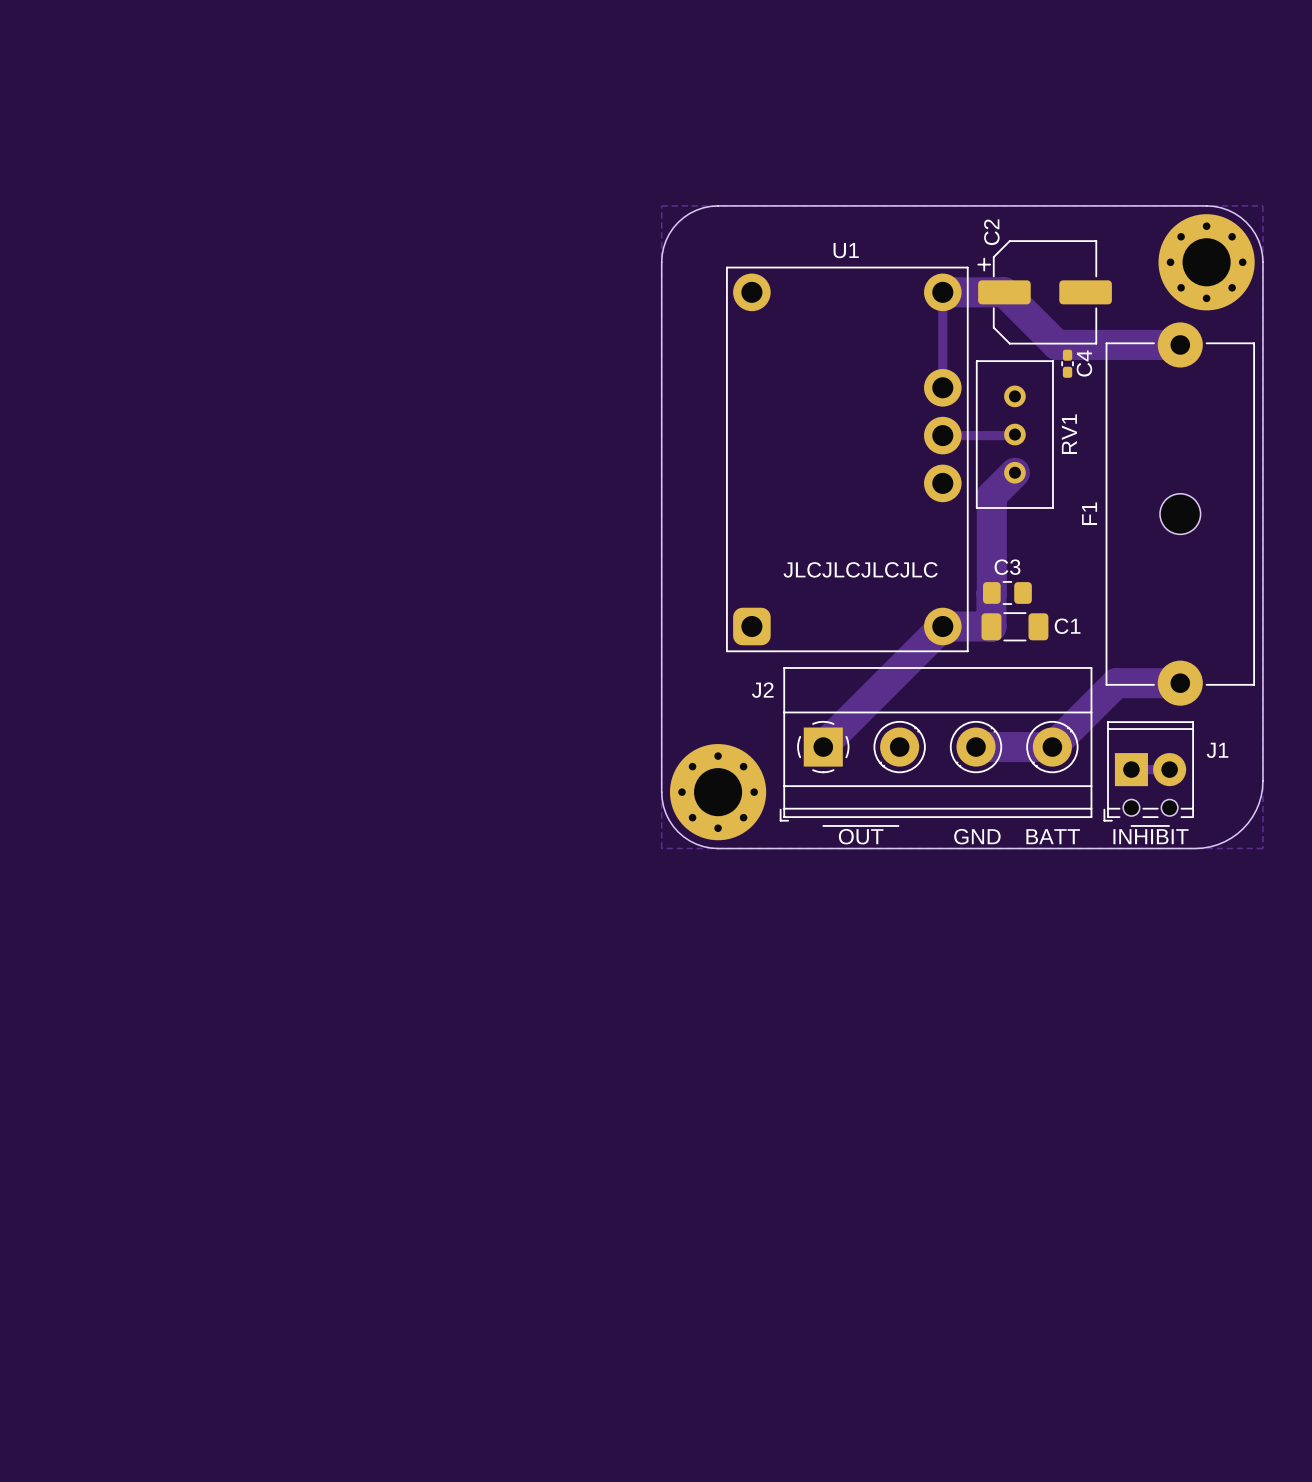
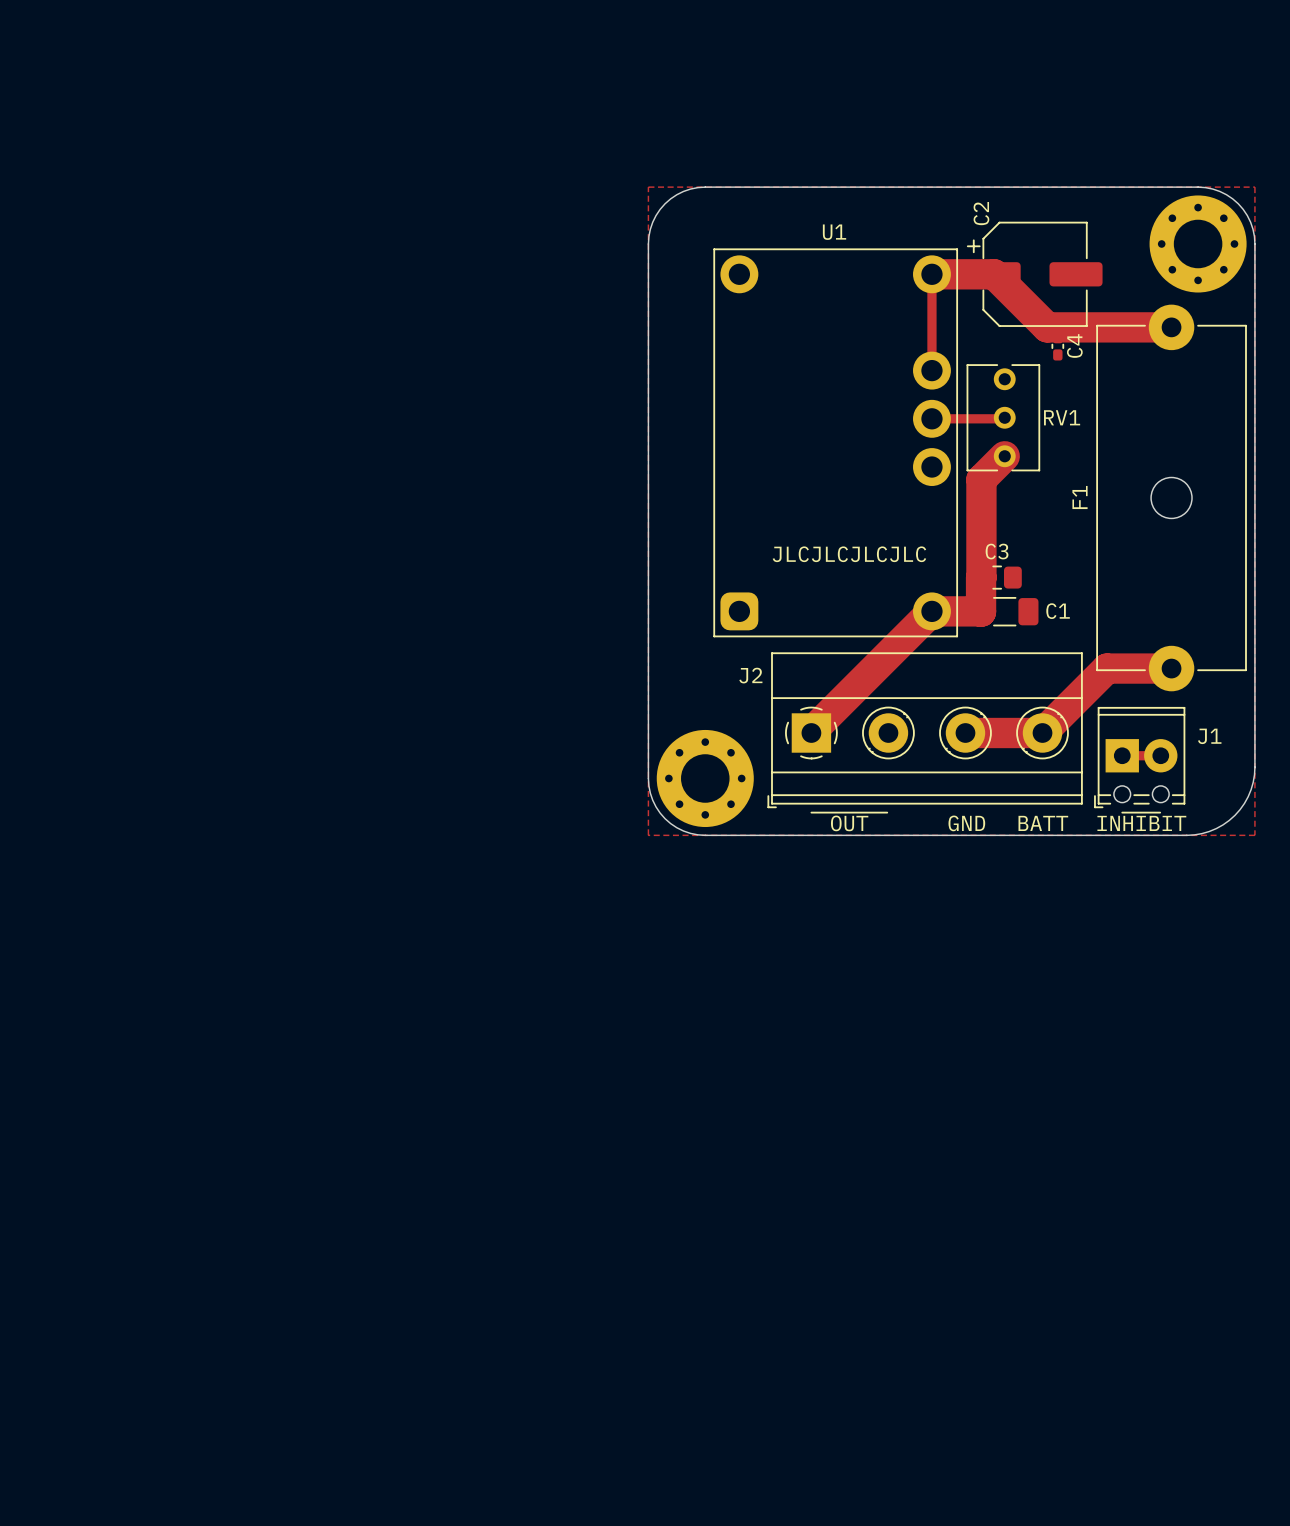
RV1 footprint: [975, 360, 1054, 509] -> [966, 364, 1041, 472]

